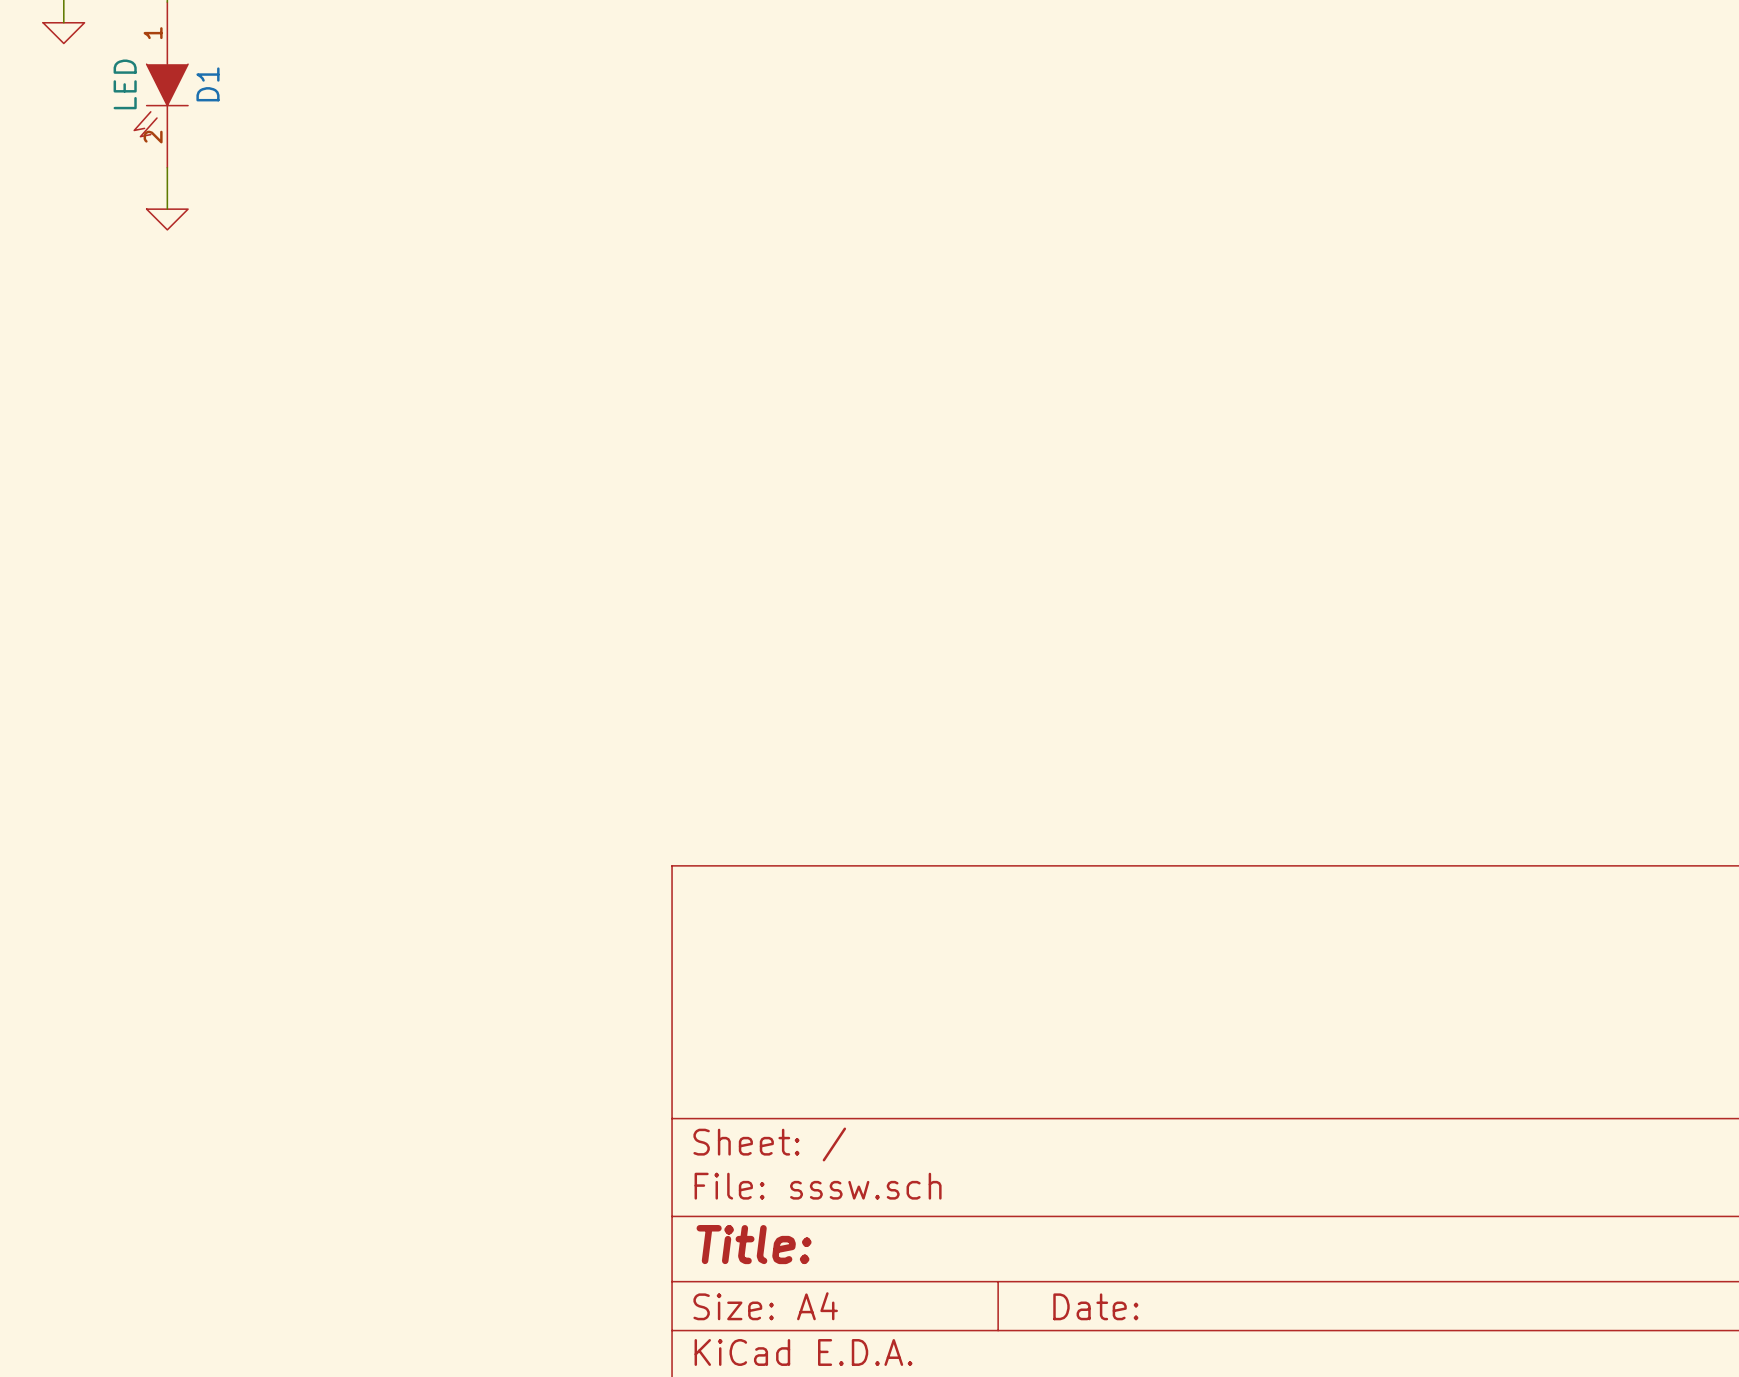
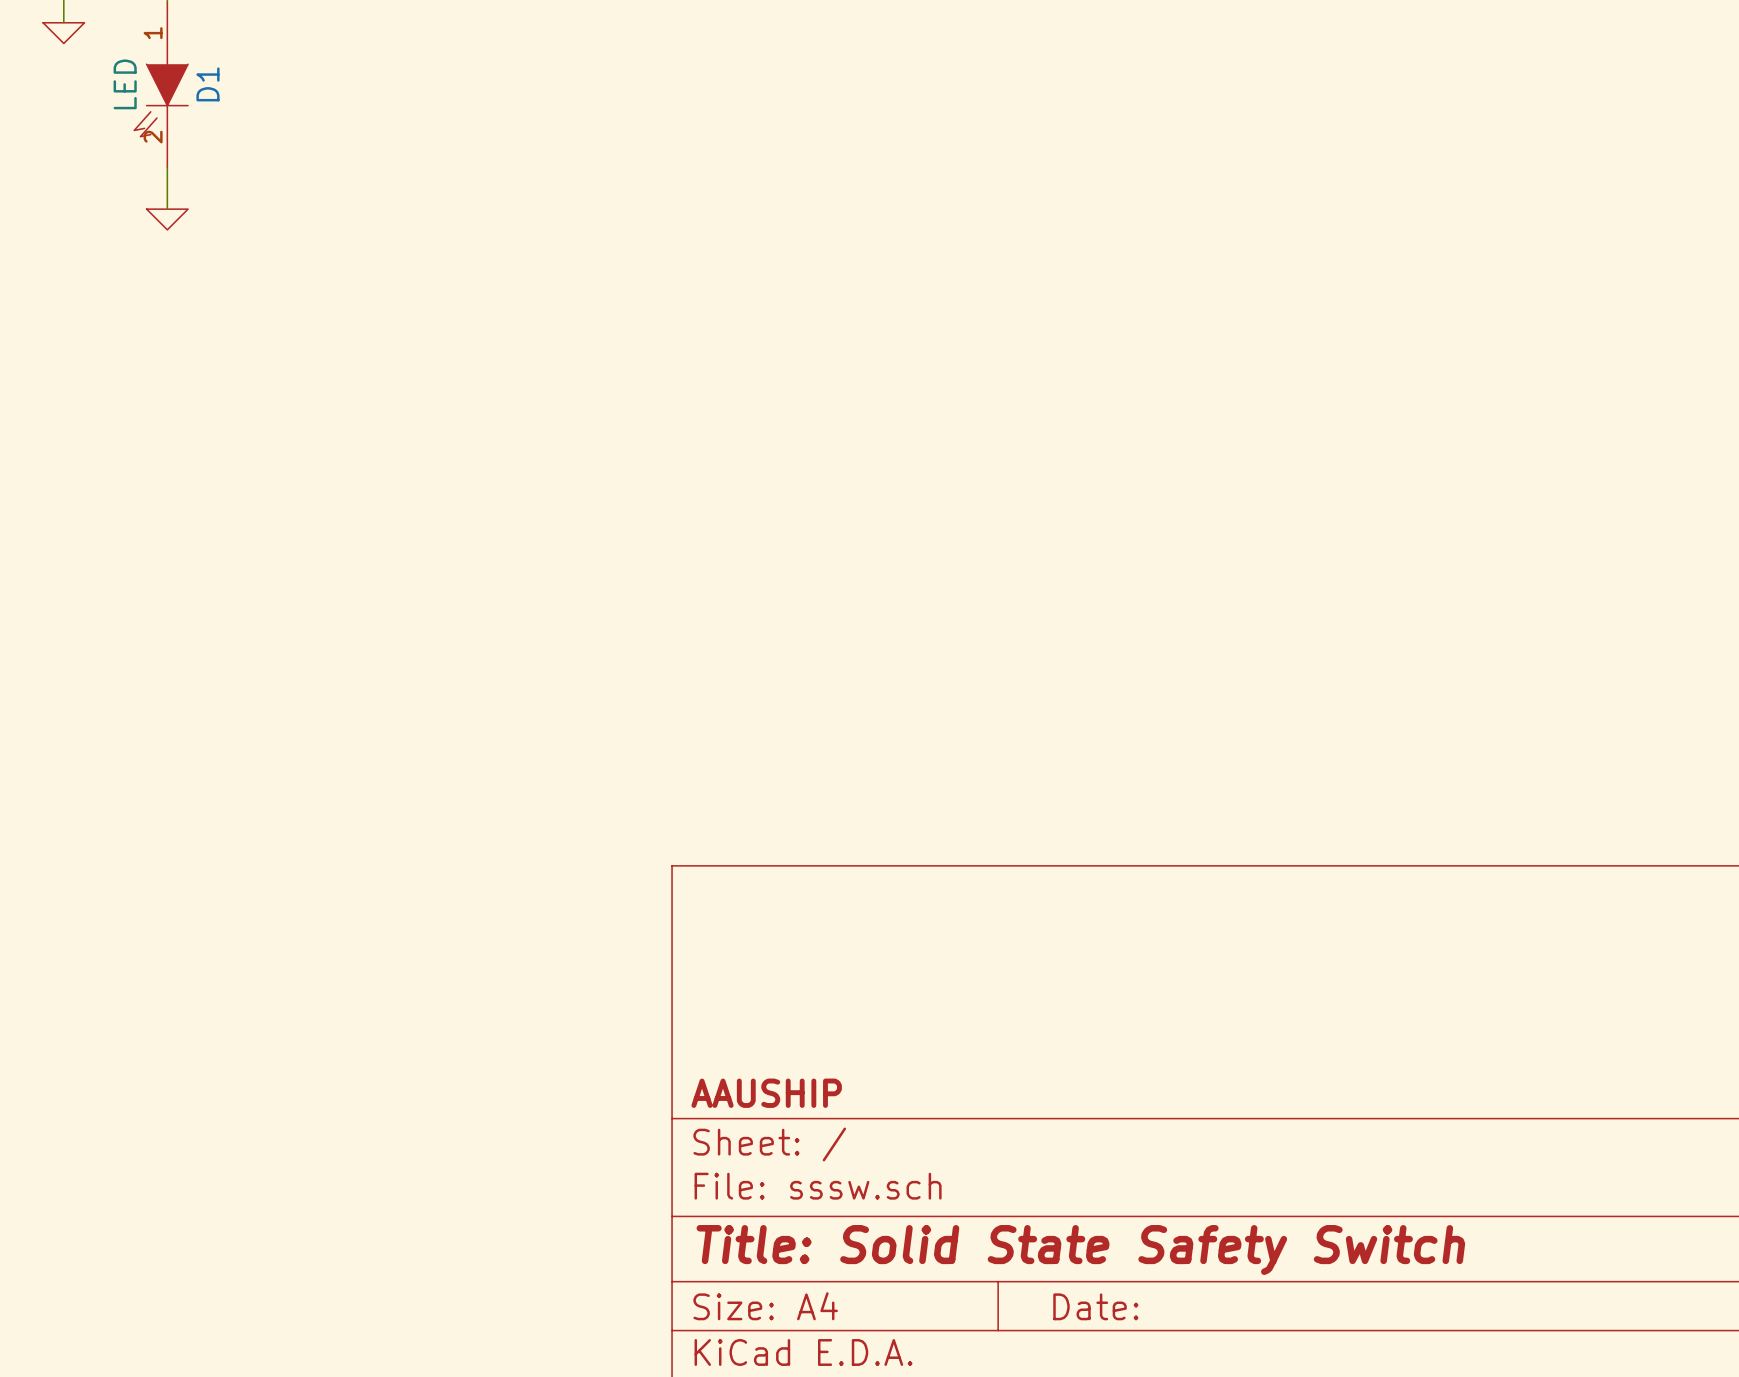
title block: none -> AAUSHIP (766, 1093)
title block: Title: (754, 1244) -> Title: Solid State Safety Switch (1080, 1250)

